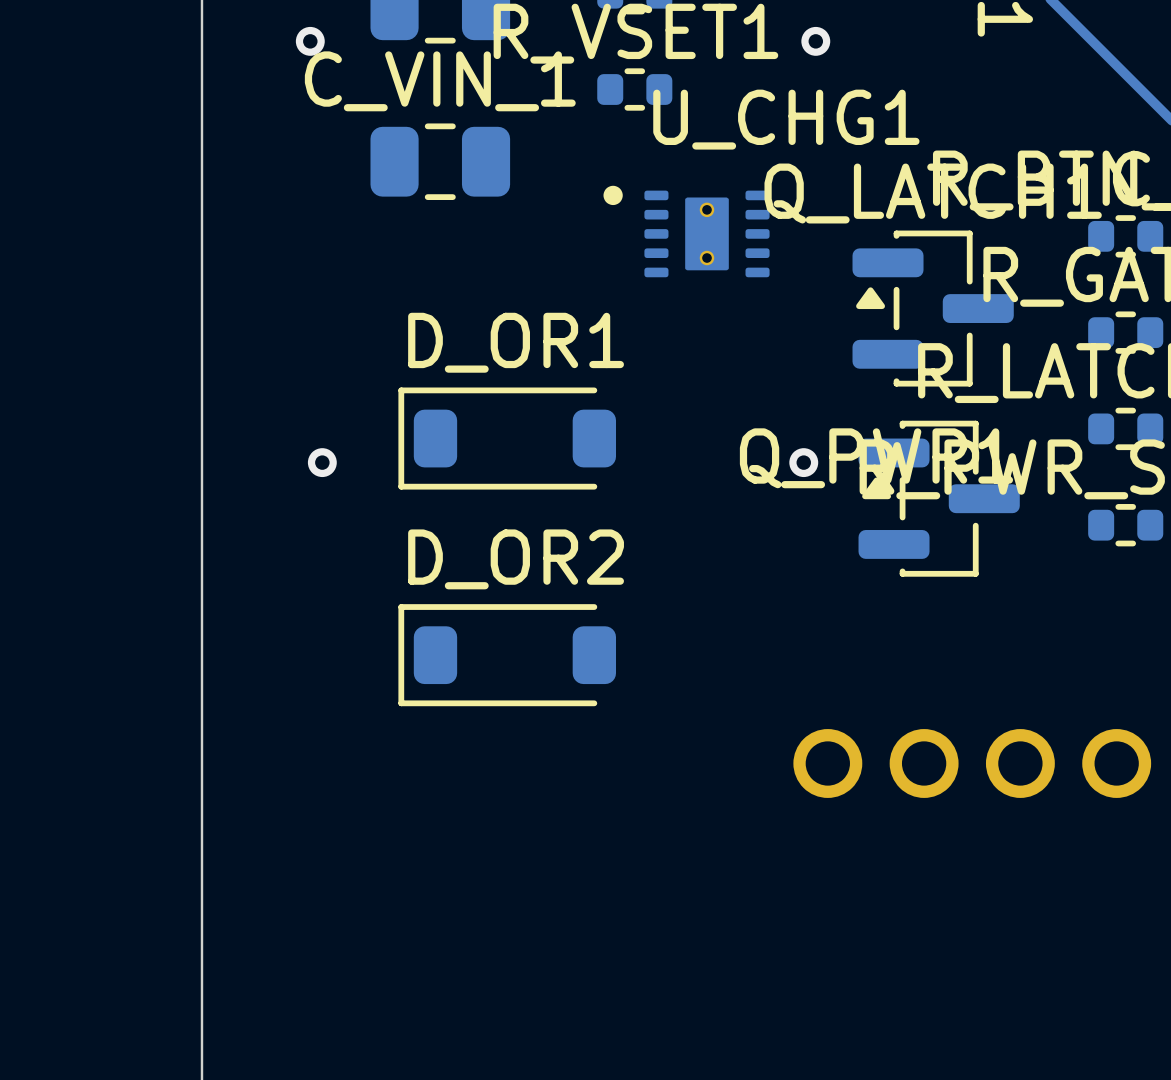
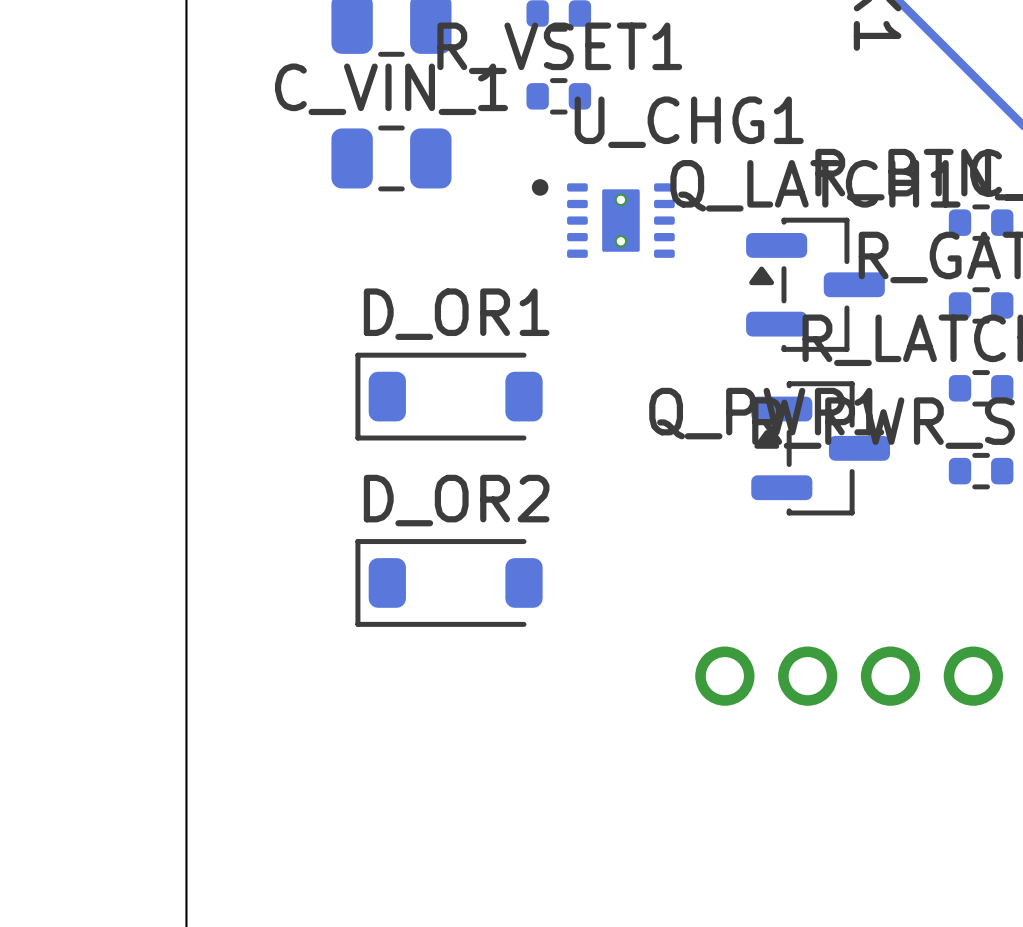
via: (310, 41) -> none
via: (815, 41) -> none
via: (322, 462) -> none
via: (803, 462) -> none

